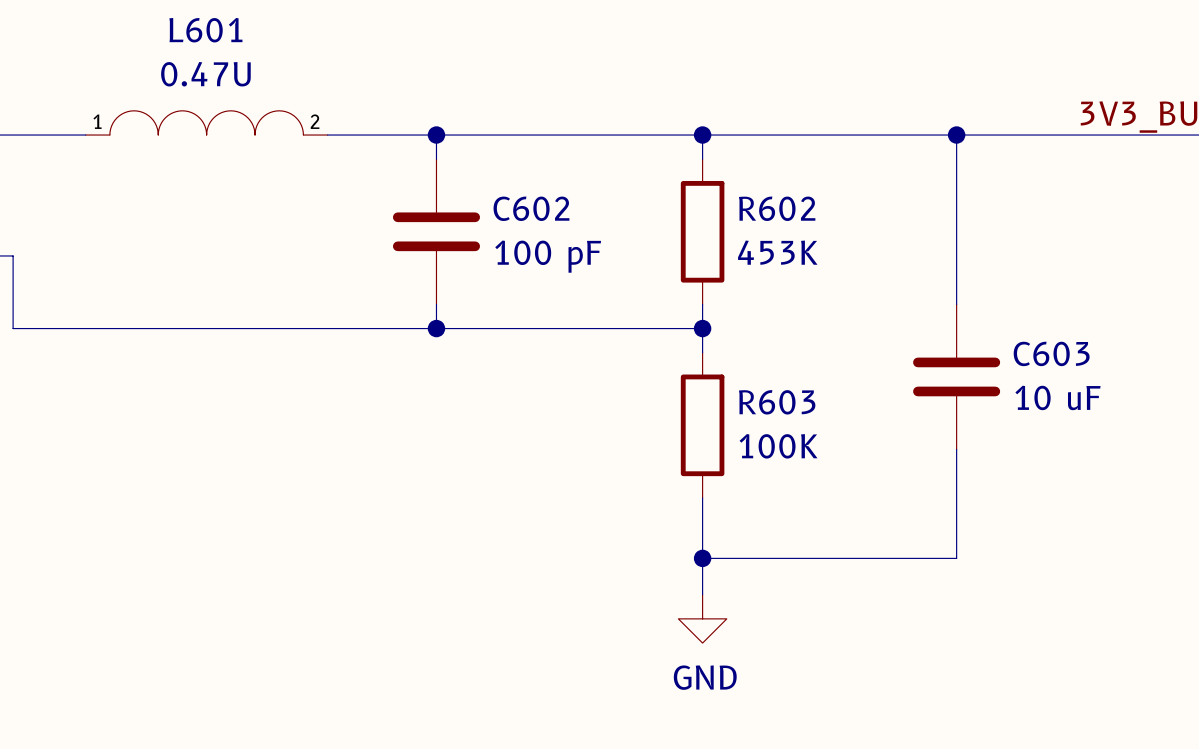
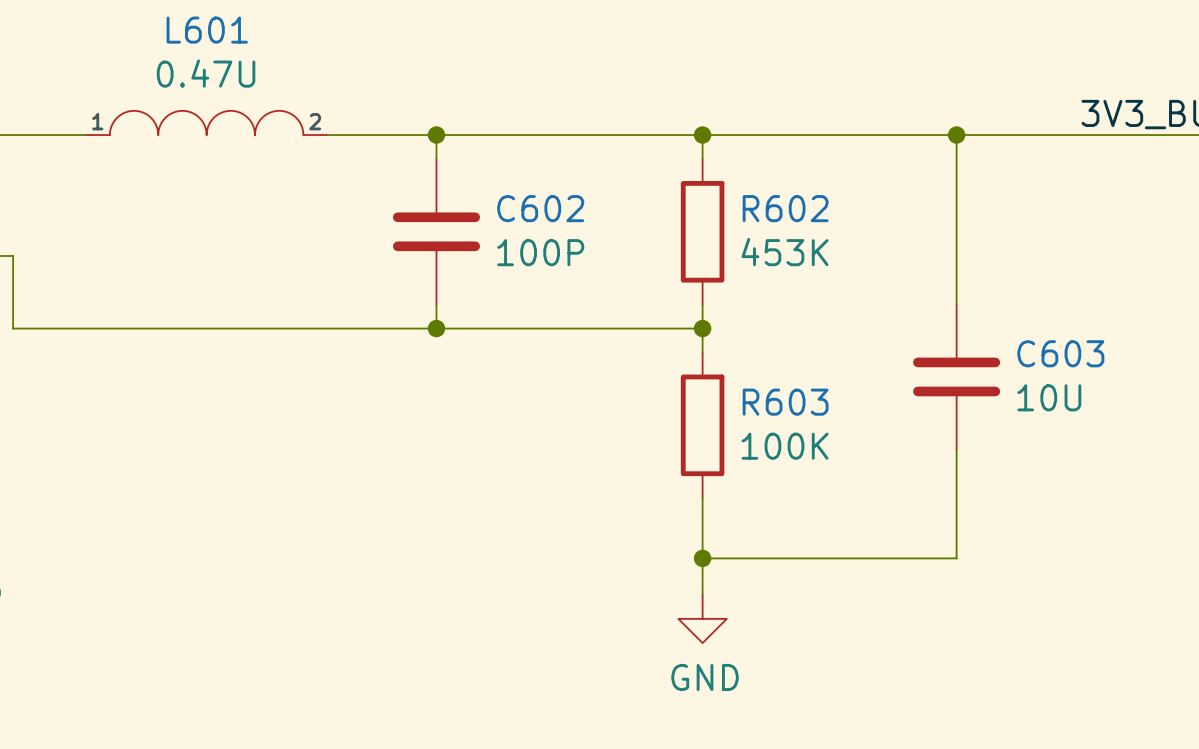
C602 value: 100 pF (548, 256) -> 100P (540, 252)
C603 value: 10 uF (1057, 397) -> 10U (1049, 397)

